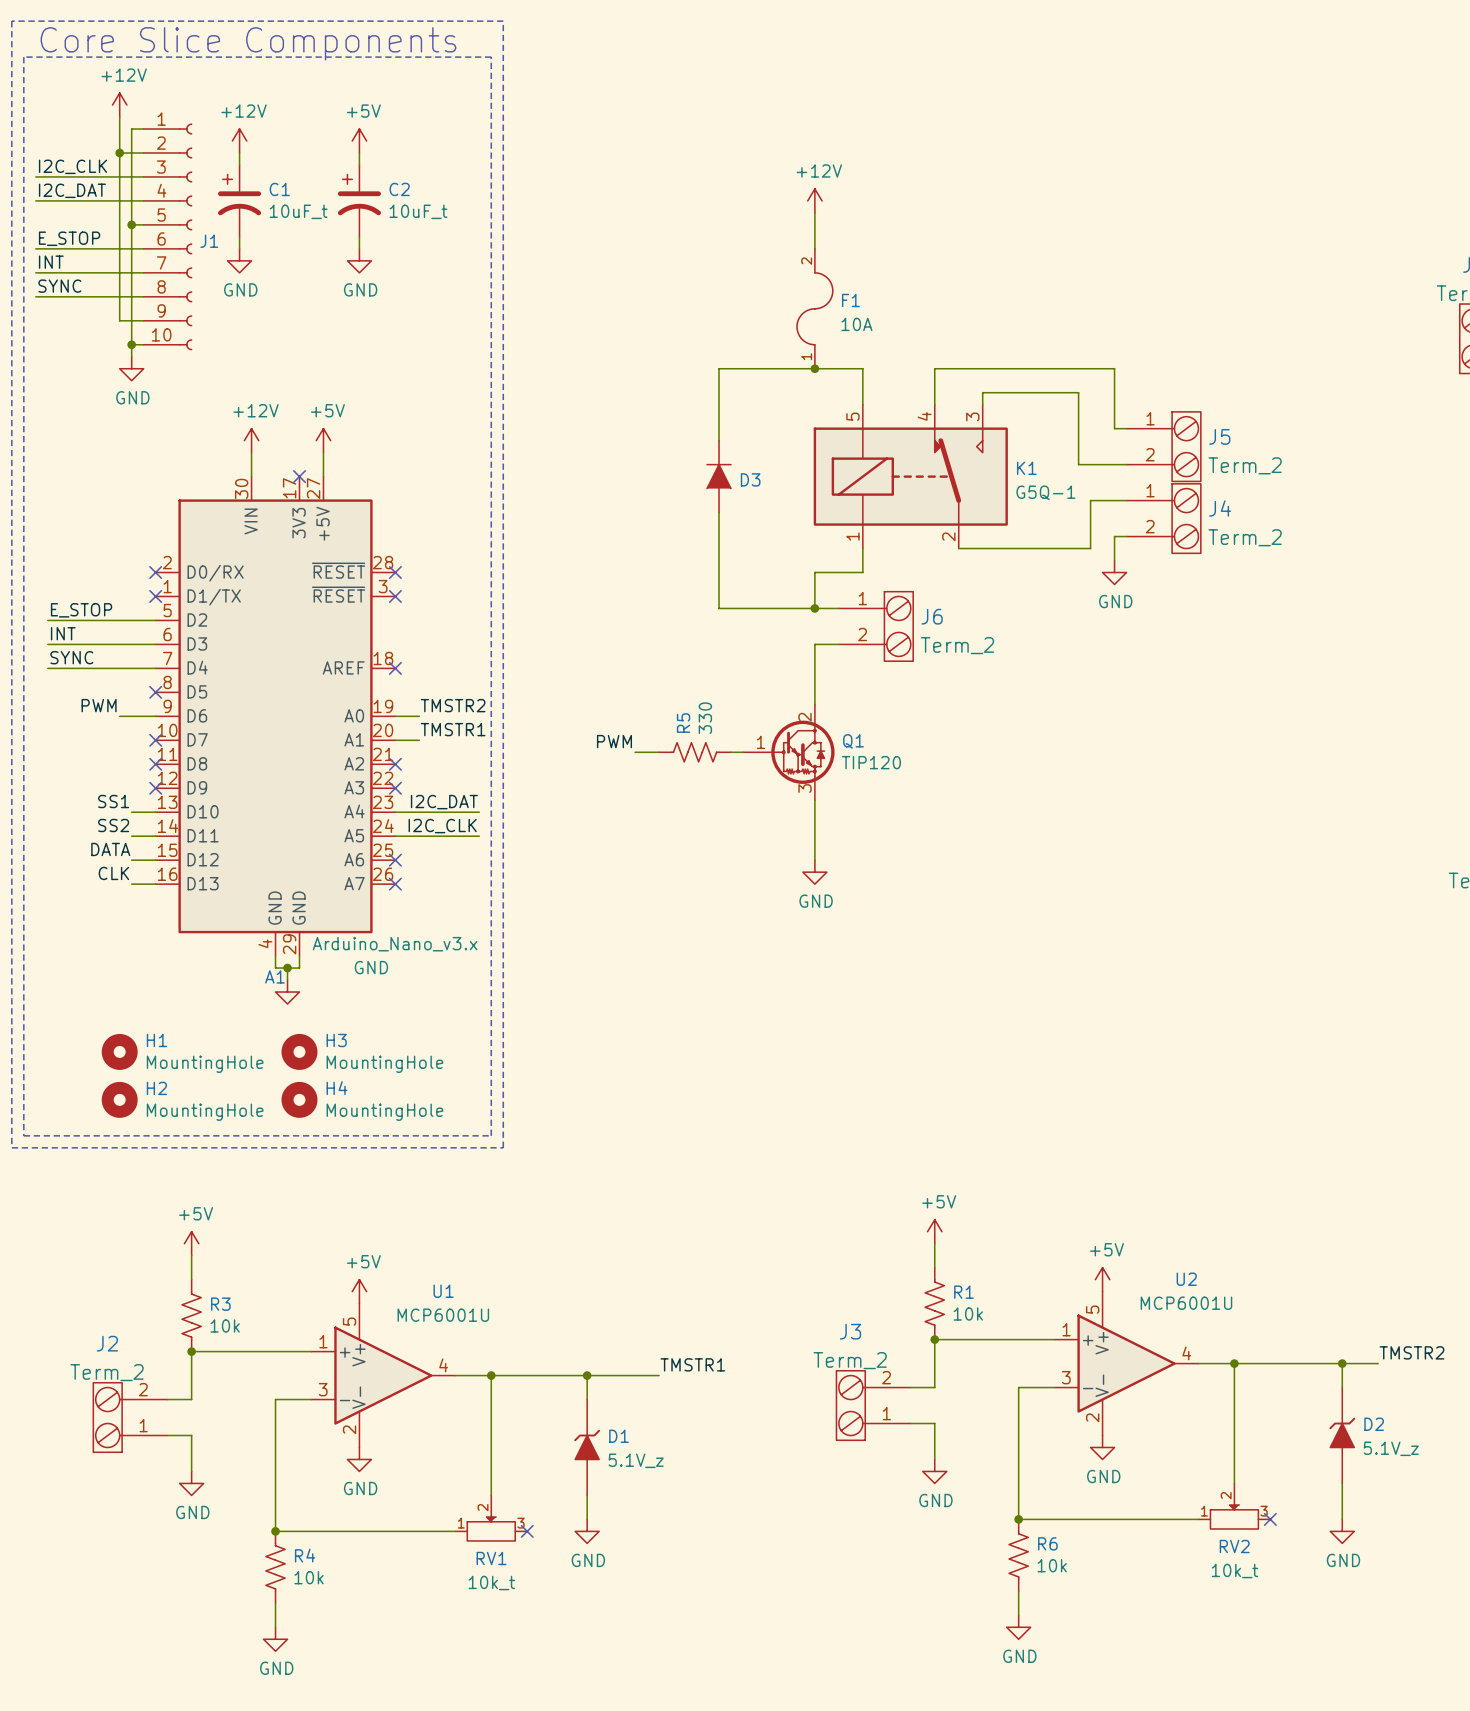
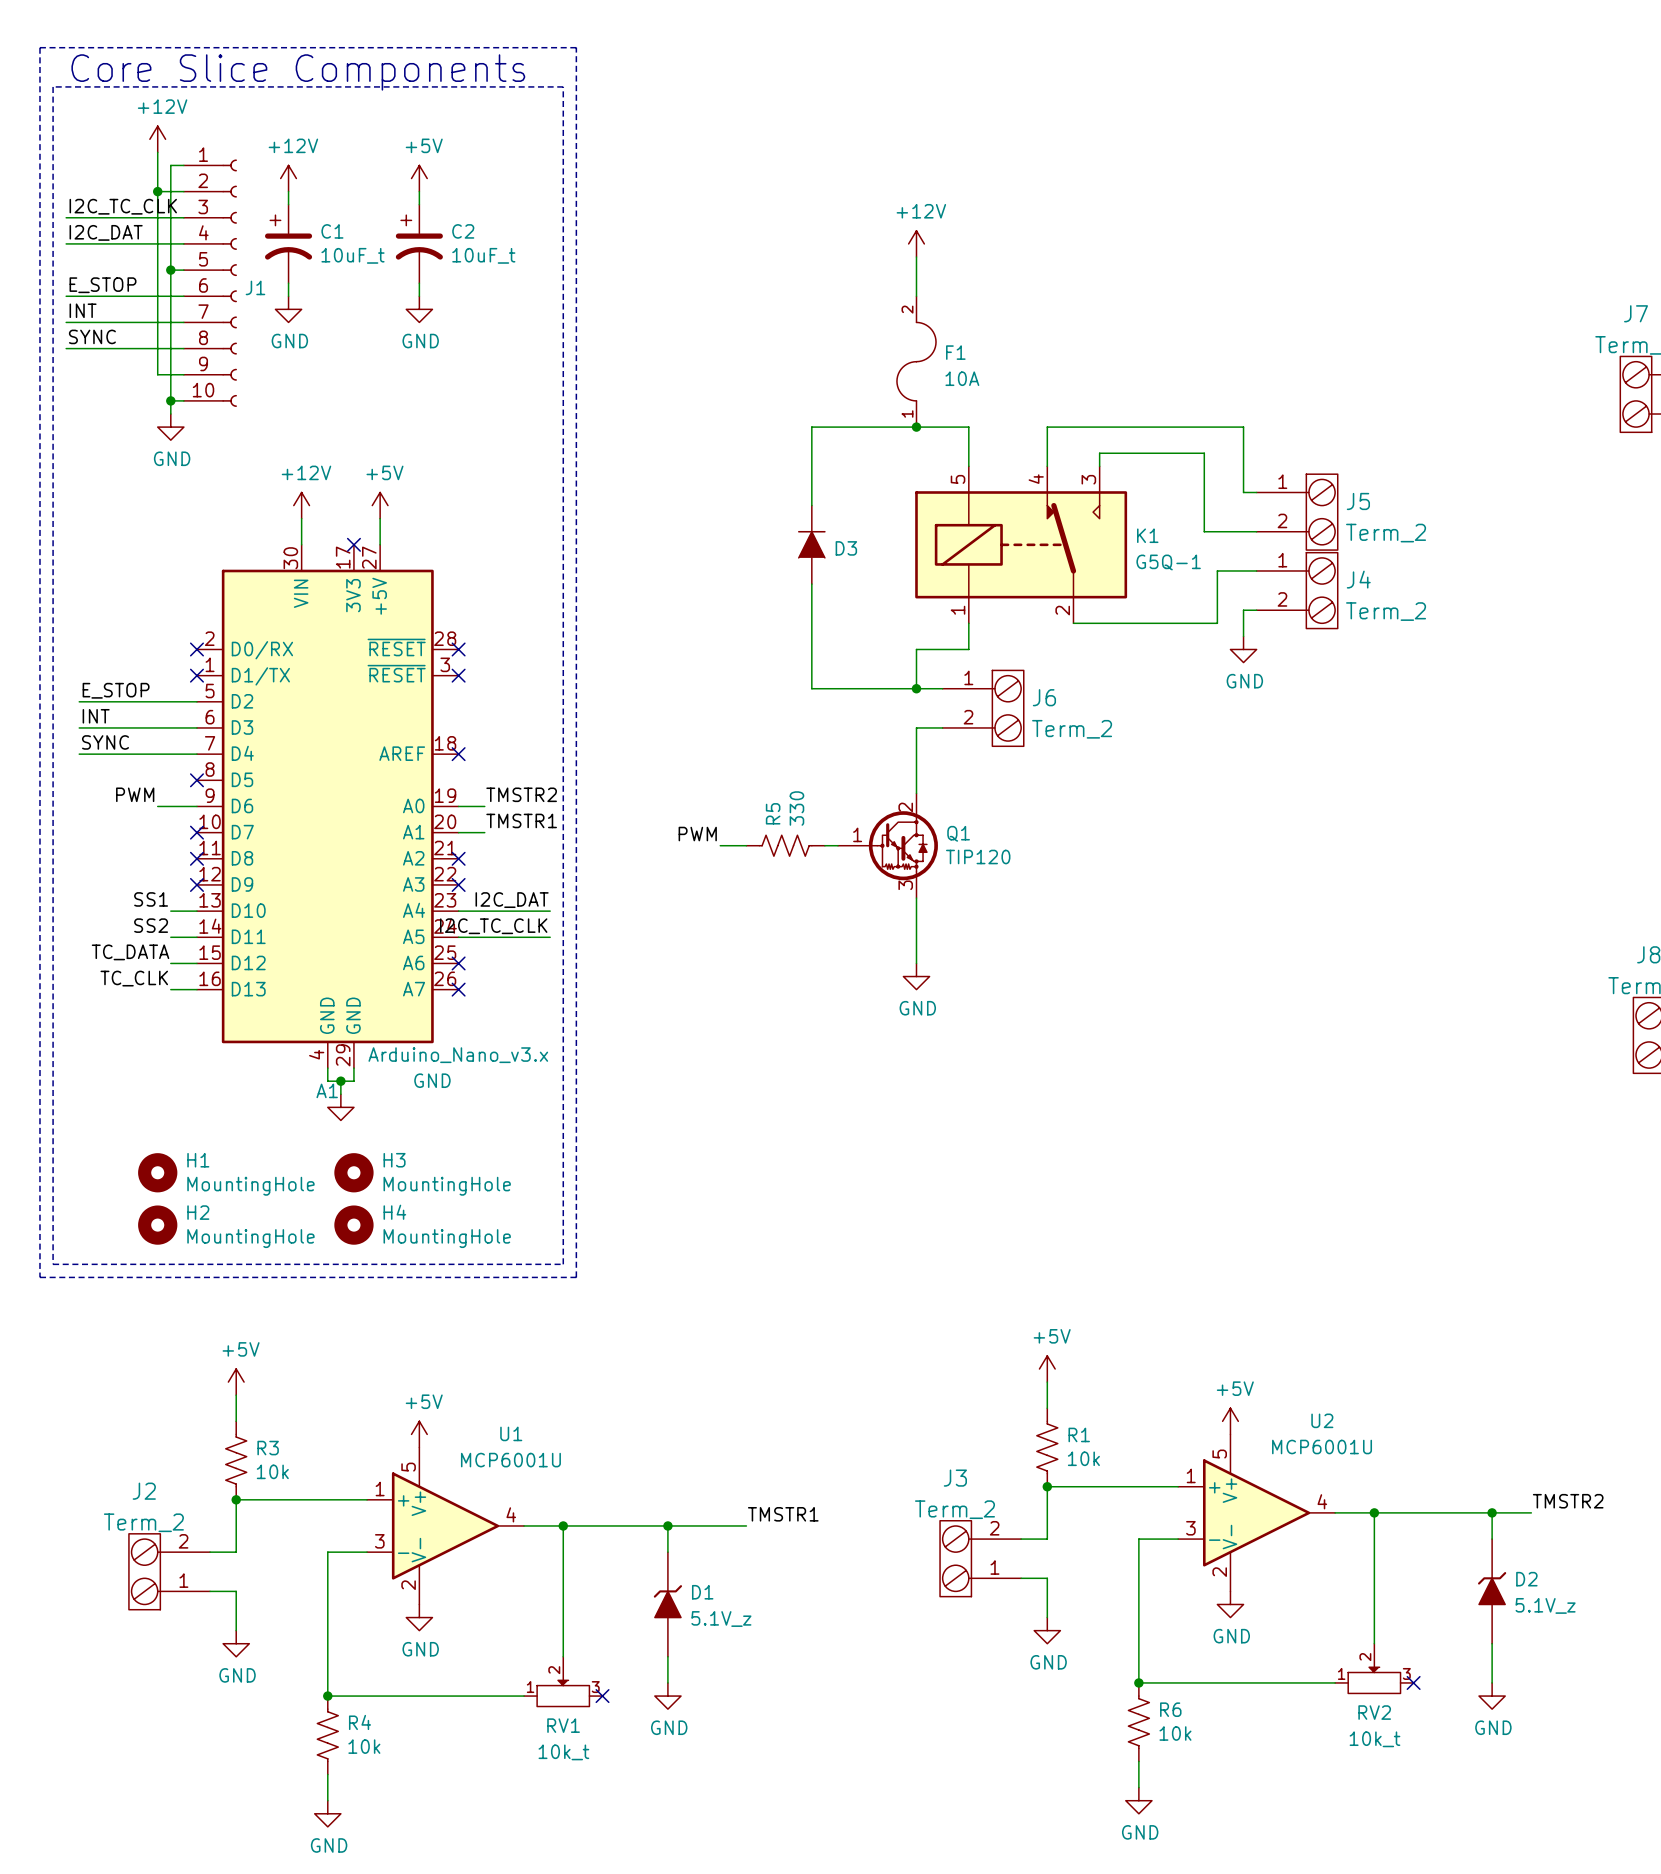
label: I2C_CLK (72, 166) -> I2C_TC_CLK (123, 206)
label: I2C_CLK (442, 826) -> I2C_TC_CLK (493, 926)
label: DATA (110, 849) -> TC_DATA (130, 952)
label: CLK (113, 873) -> TC_CLK (134, 978)

